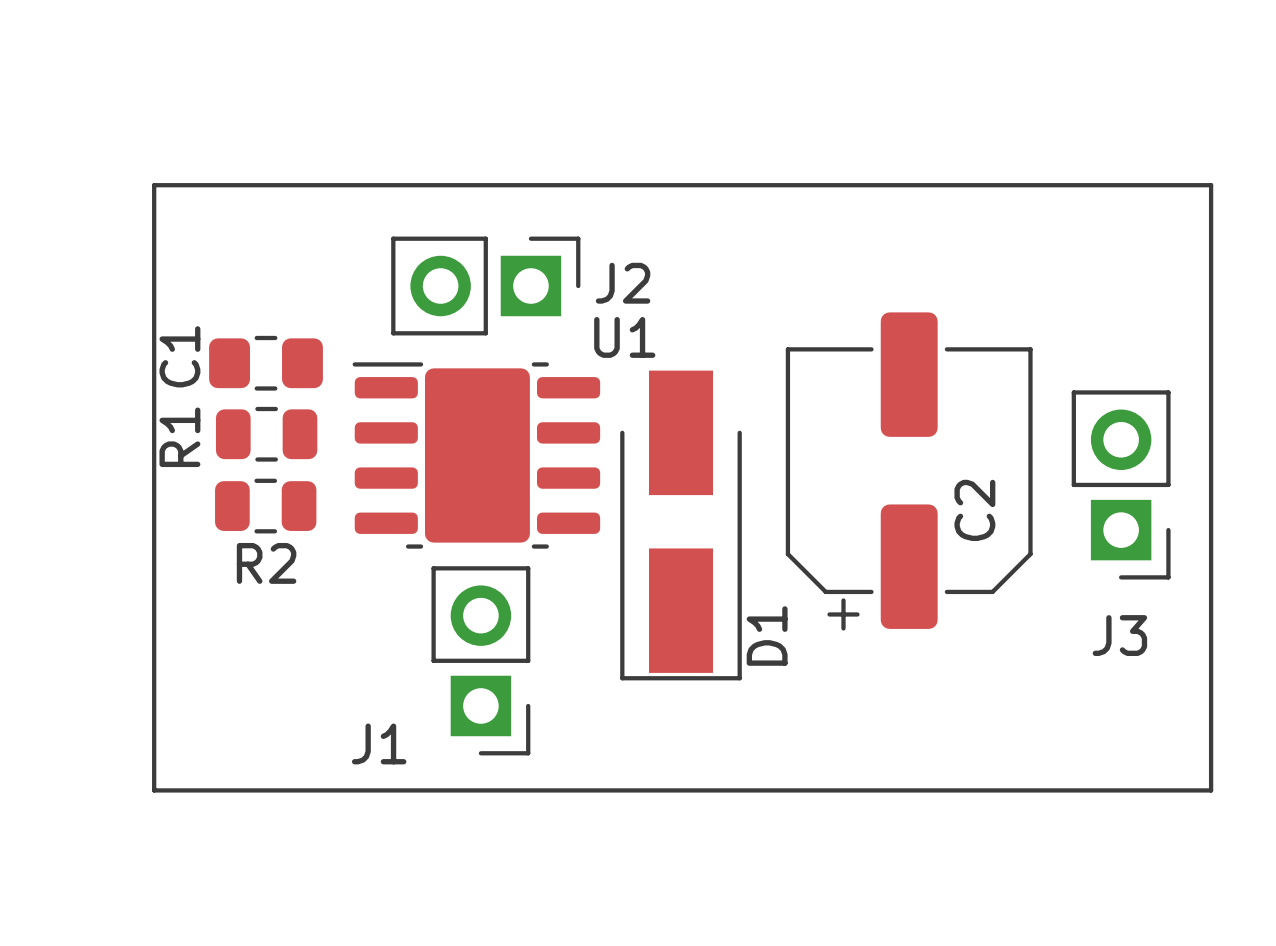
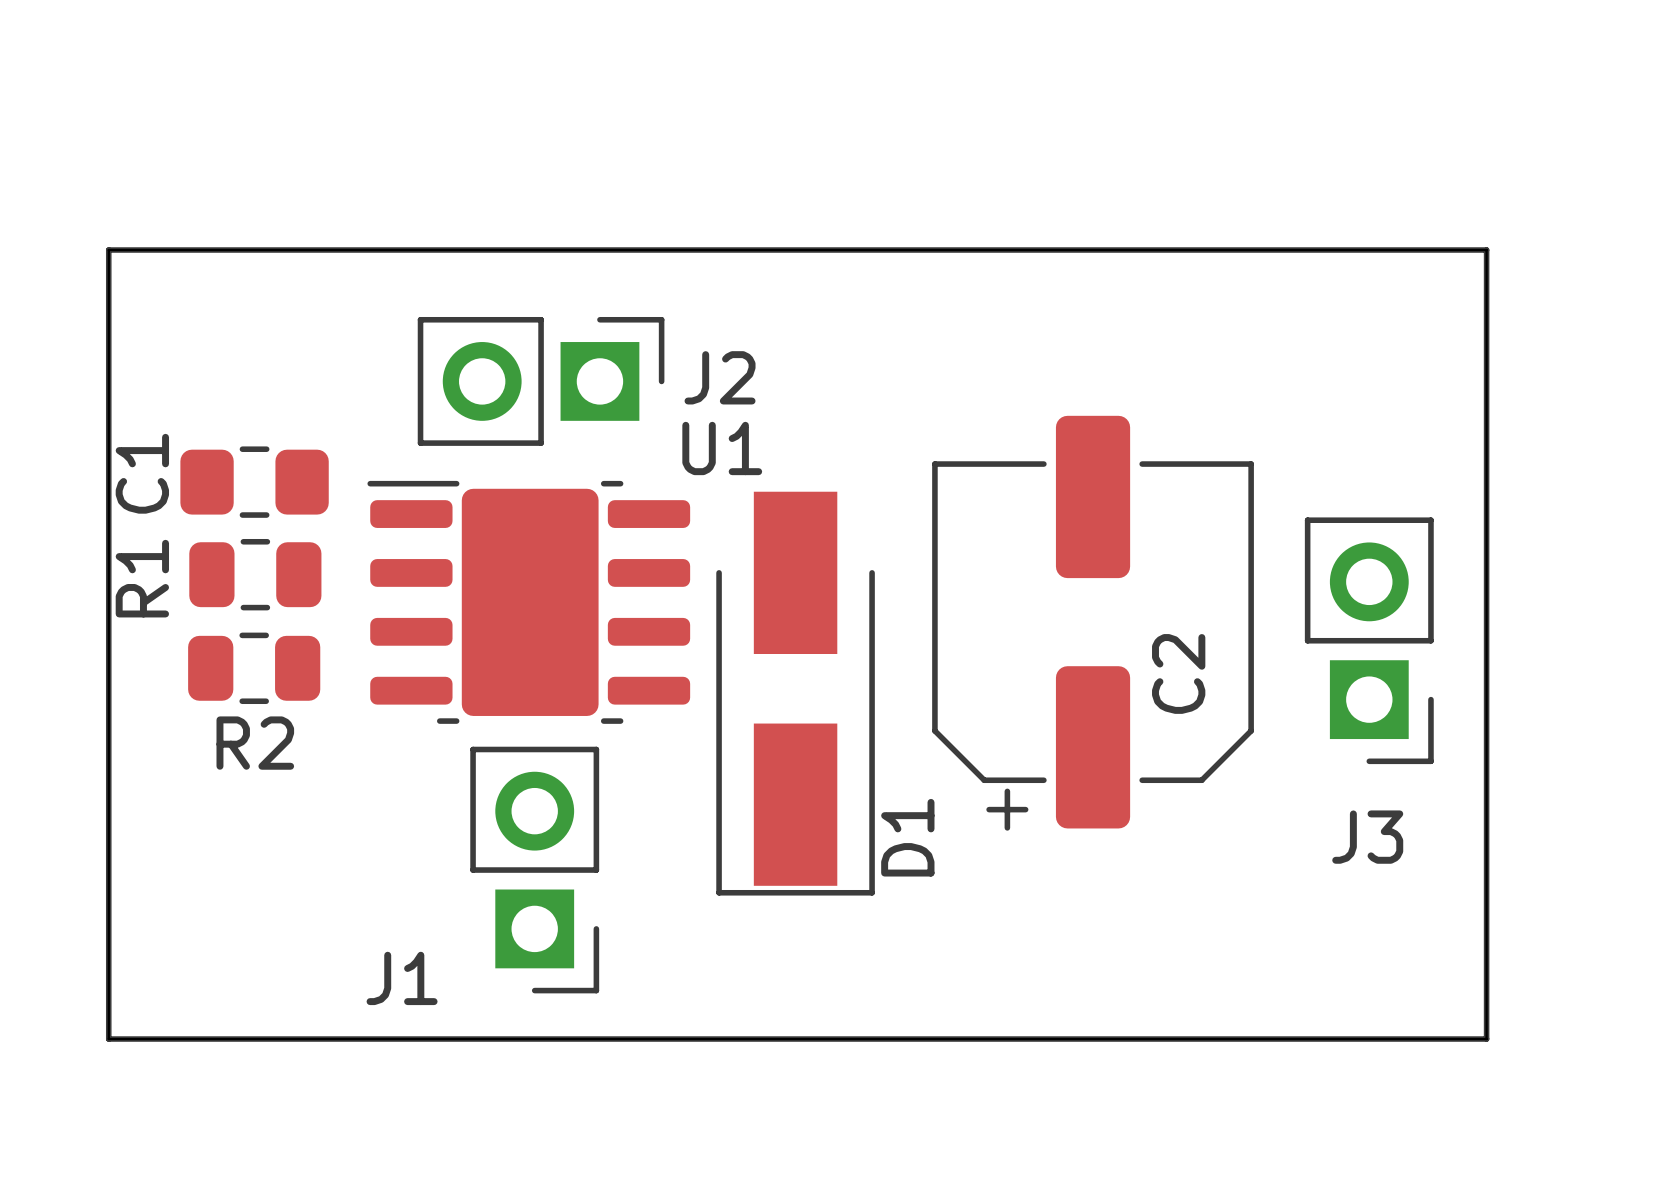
board edge: none -> (108, 250) (108, 1039) (1486, 1039) (1486, 250) (108, 250)

